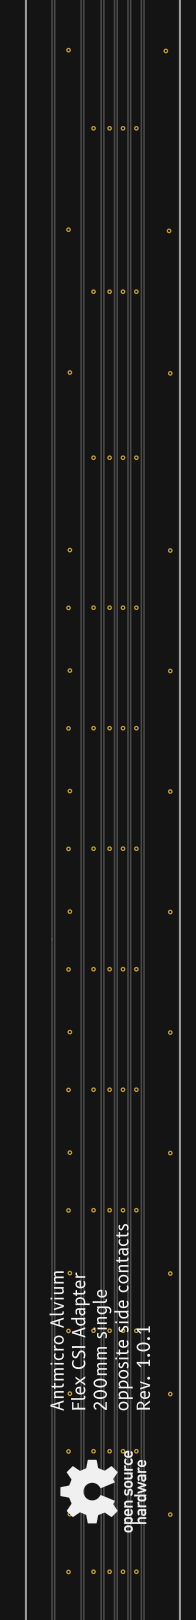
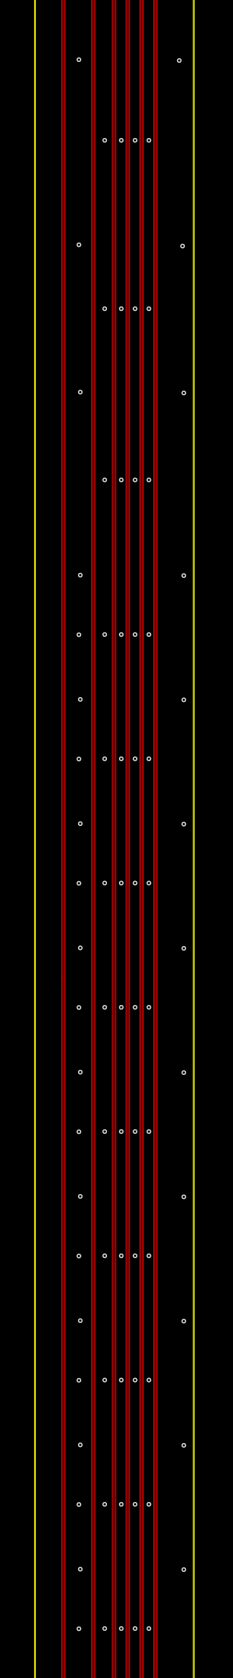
text: opposite side contacts (123, 1317) -> none
text: Antmicro Alvium (56, 1341) -> none
text: Flex CSI Adapter (80, 1341) -> none
text: 200mm single (101, 1349) -> none
text: Rev. 1.0.1 (143, 1368) -> none
drawing: [60, 1450, 147, 1533] -> none

